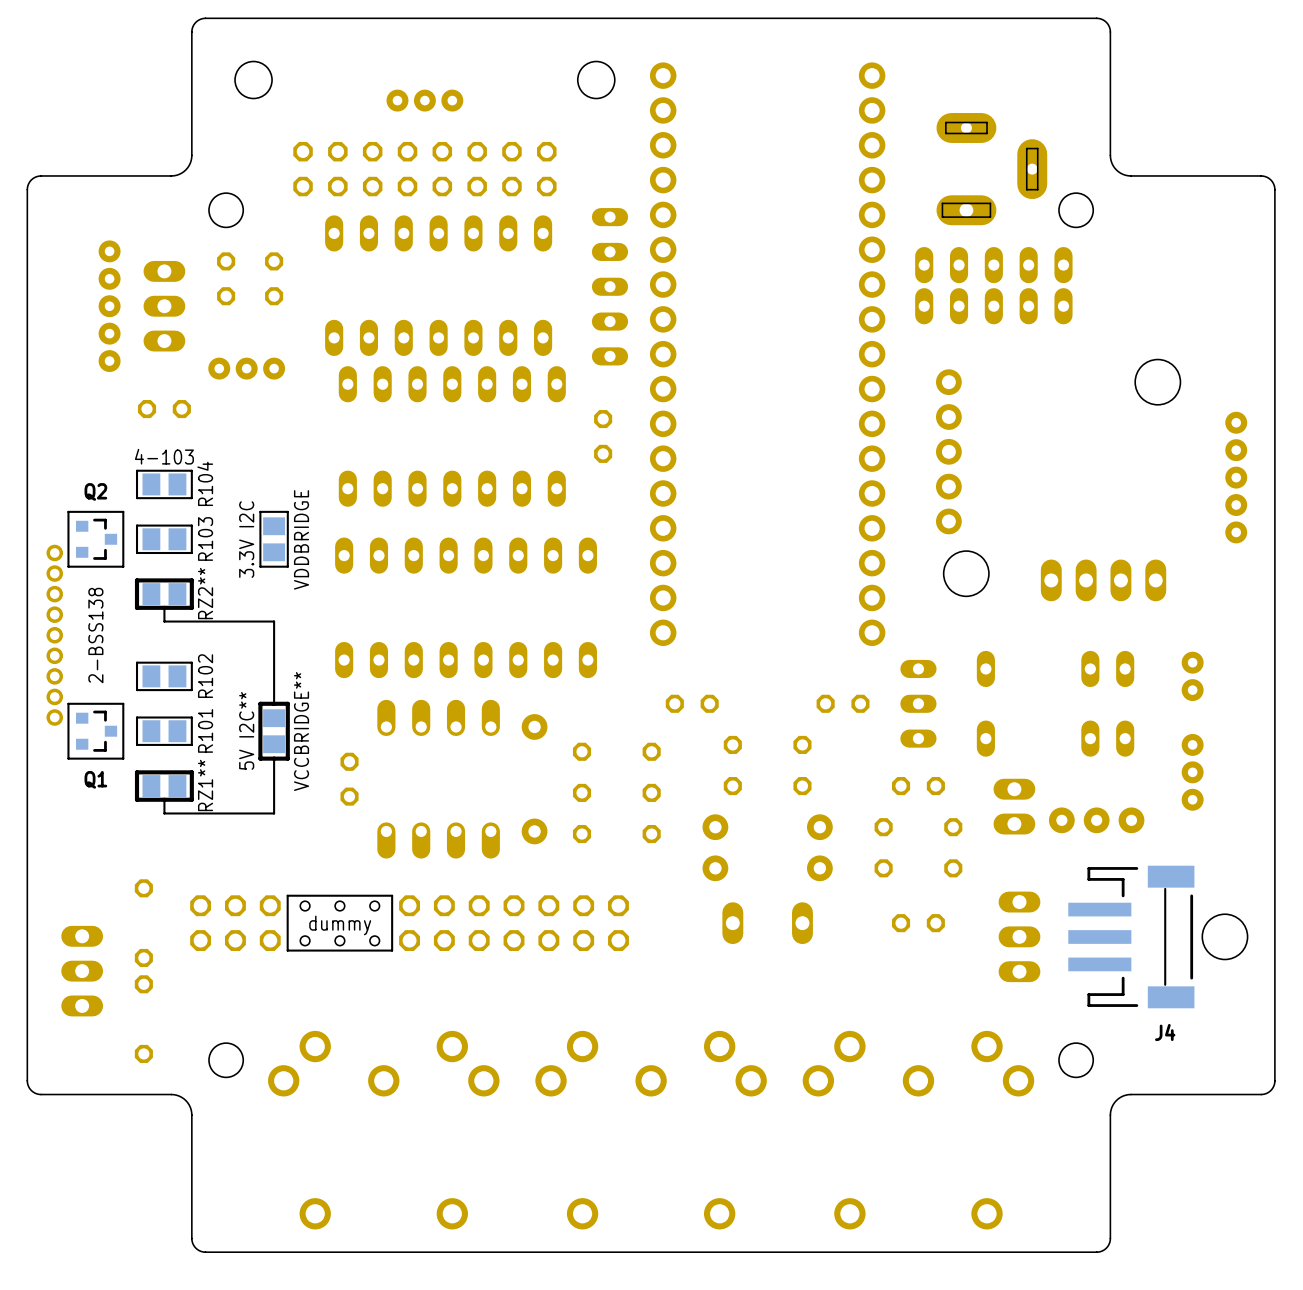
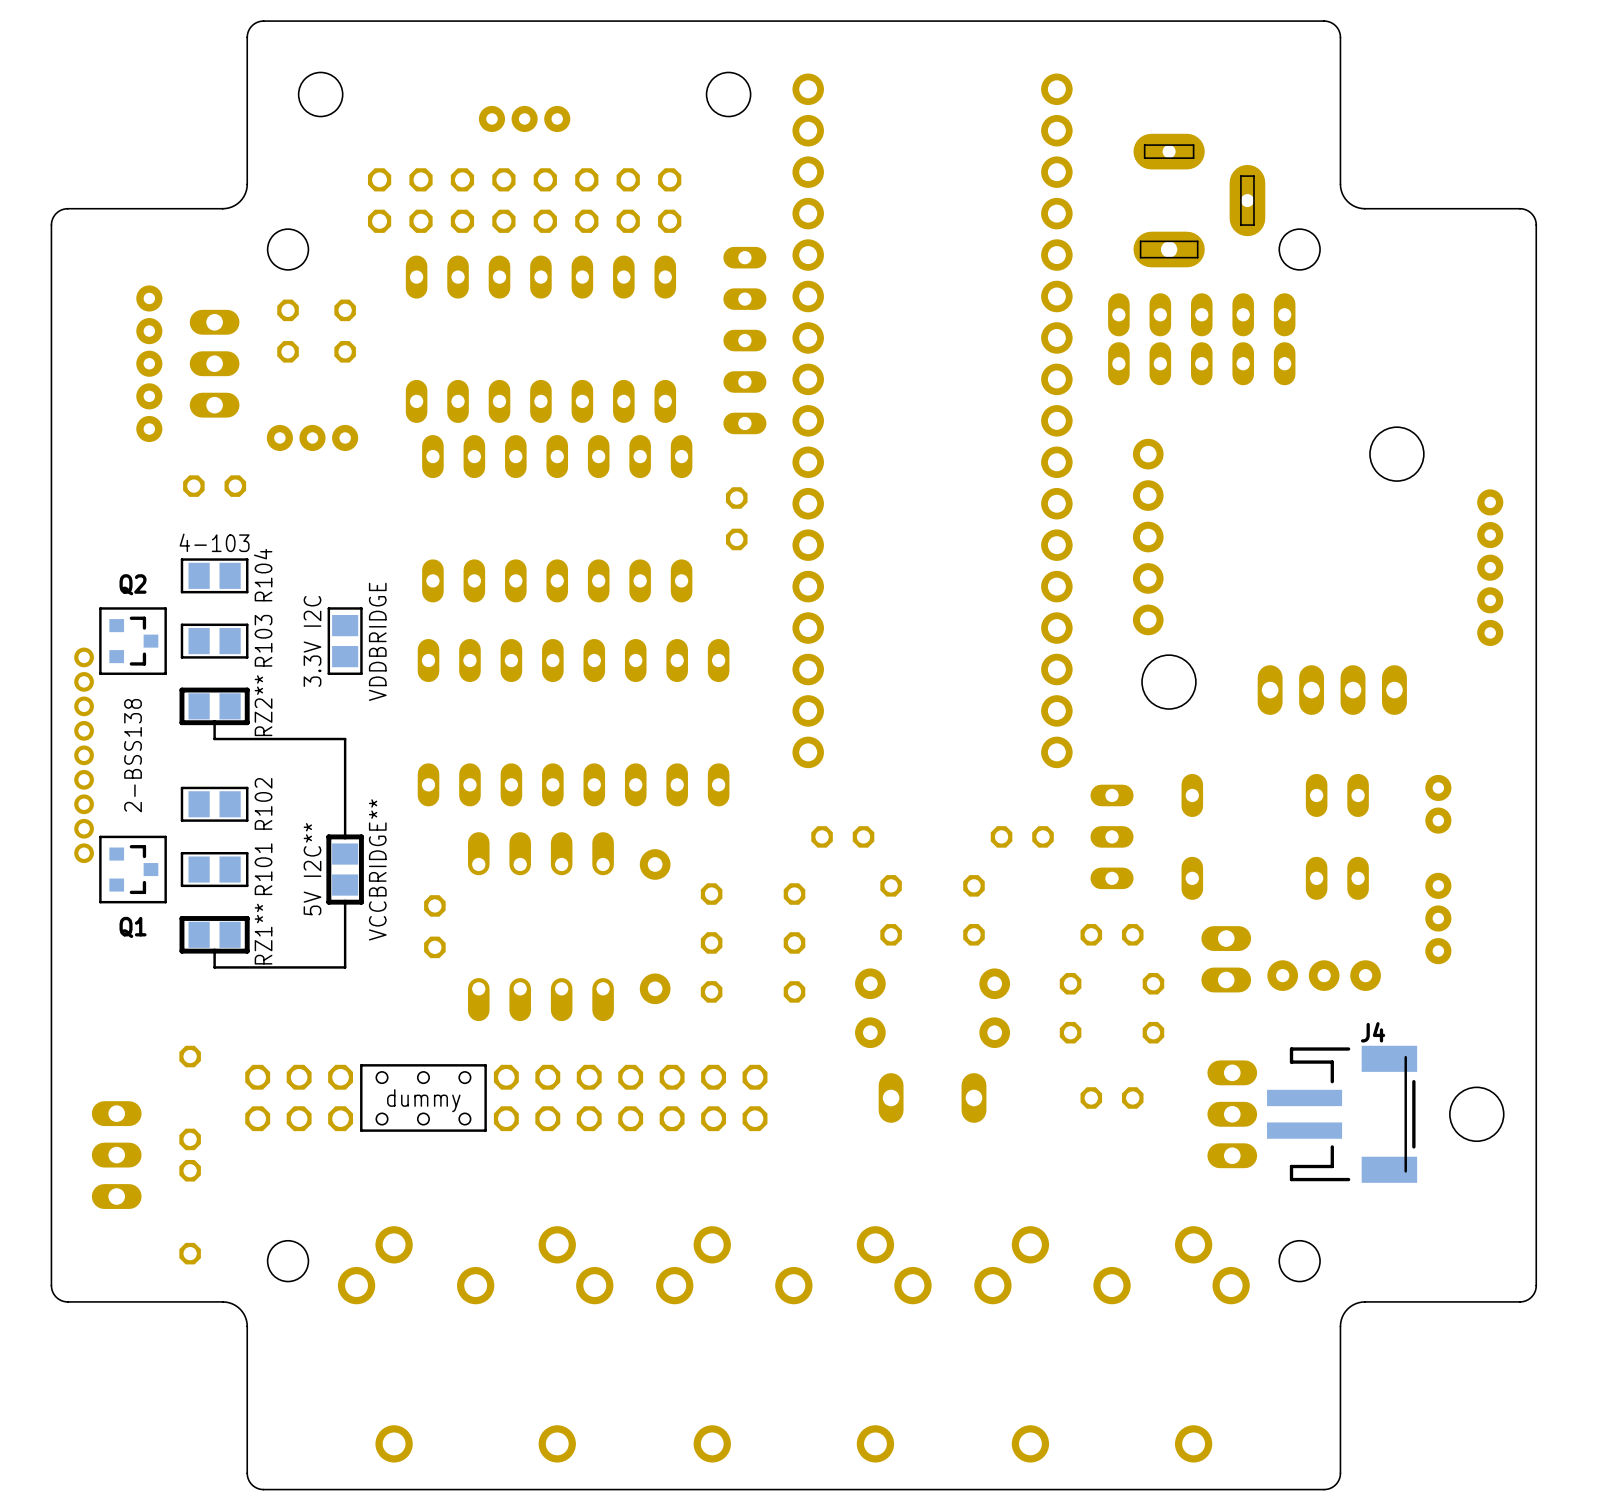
J4 footprint: [1068, 865, 1195, 1009] -> [1267, 1045, 1418, 1183]
J4 name position: J4 (1165, 1032) -> J4 (1373, 1032)

